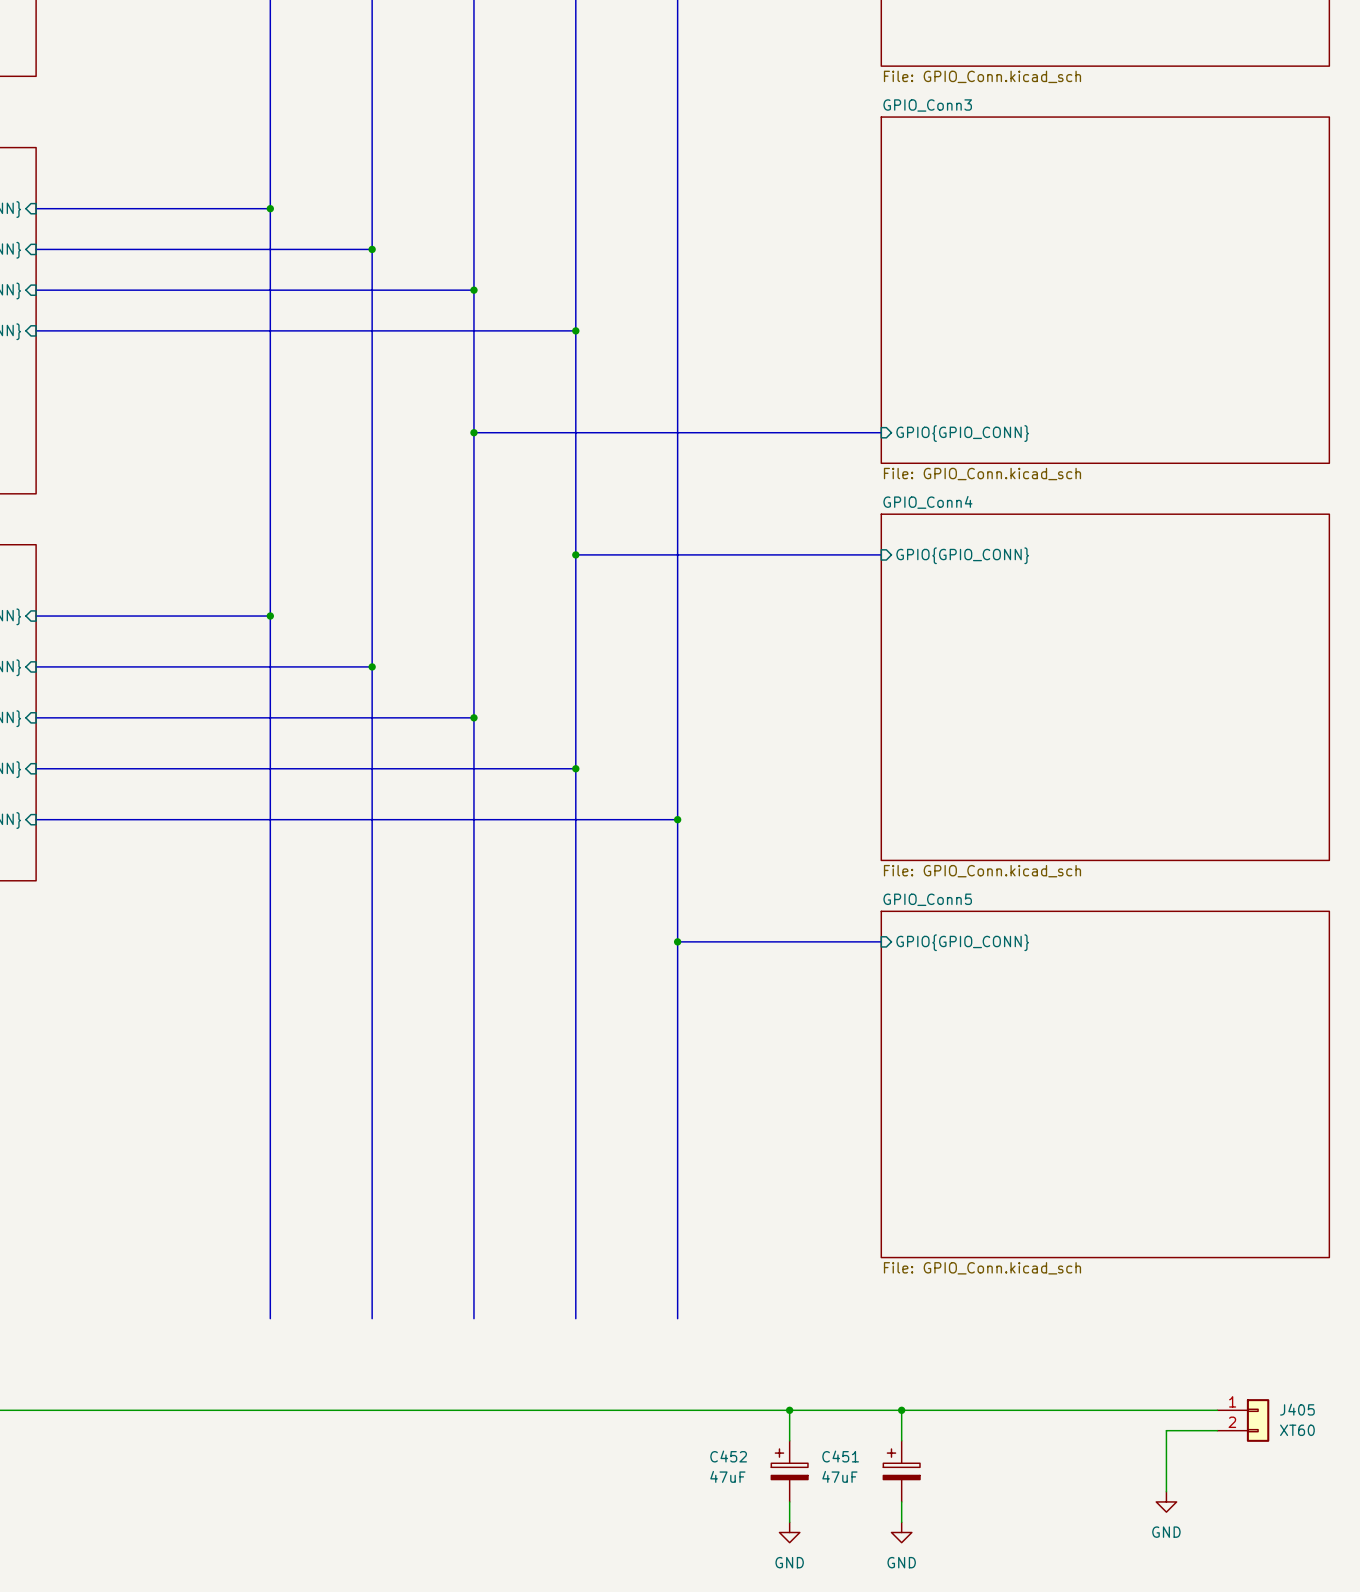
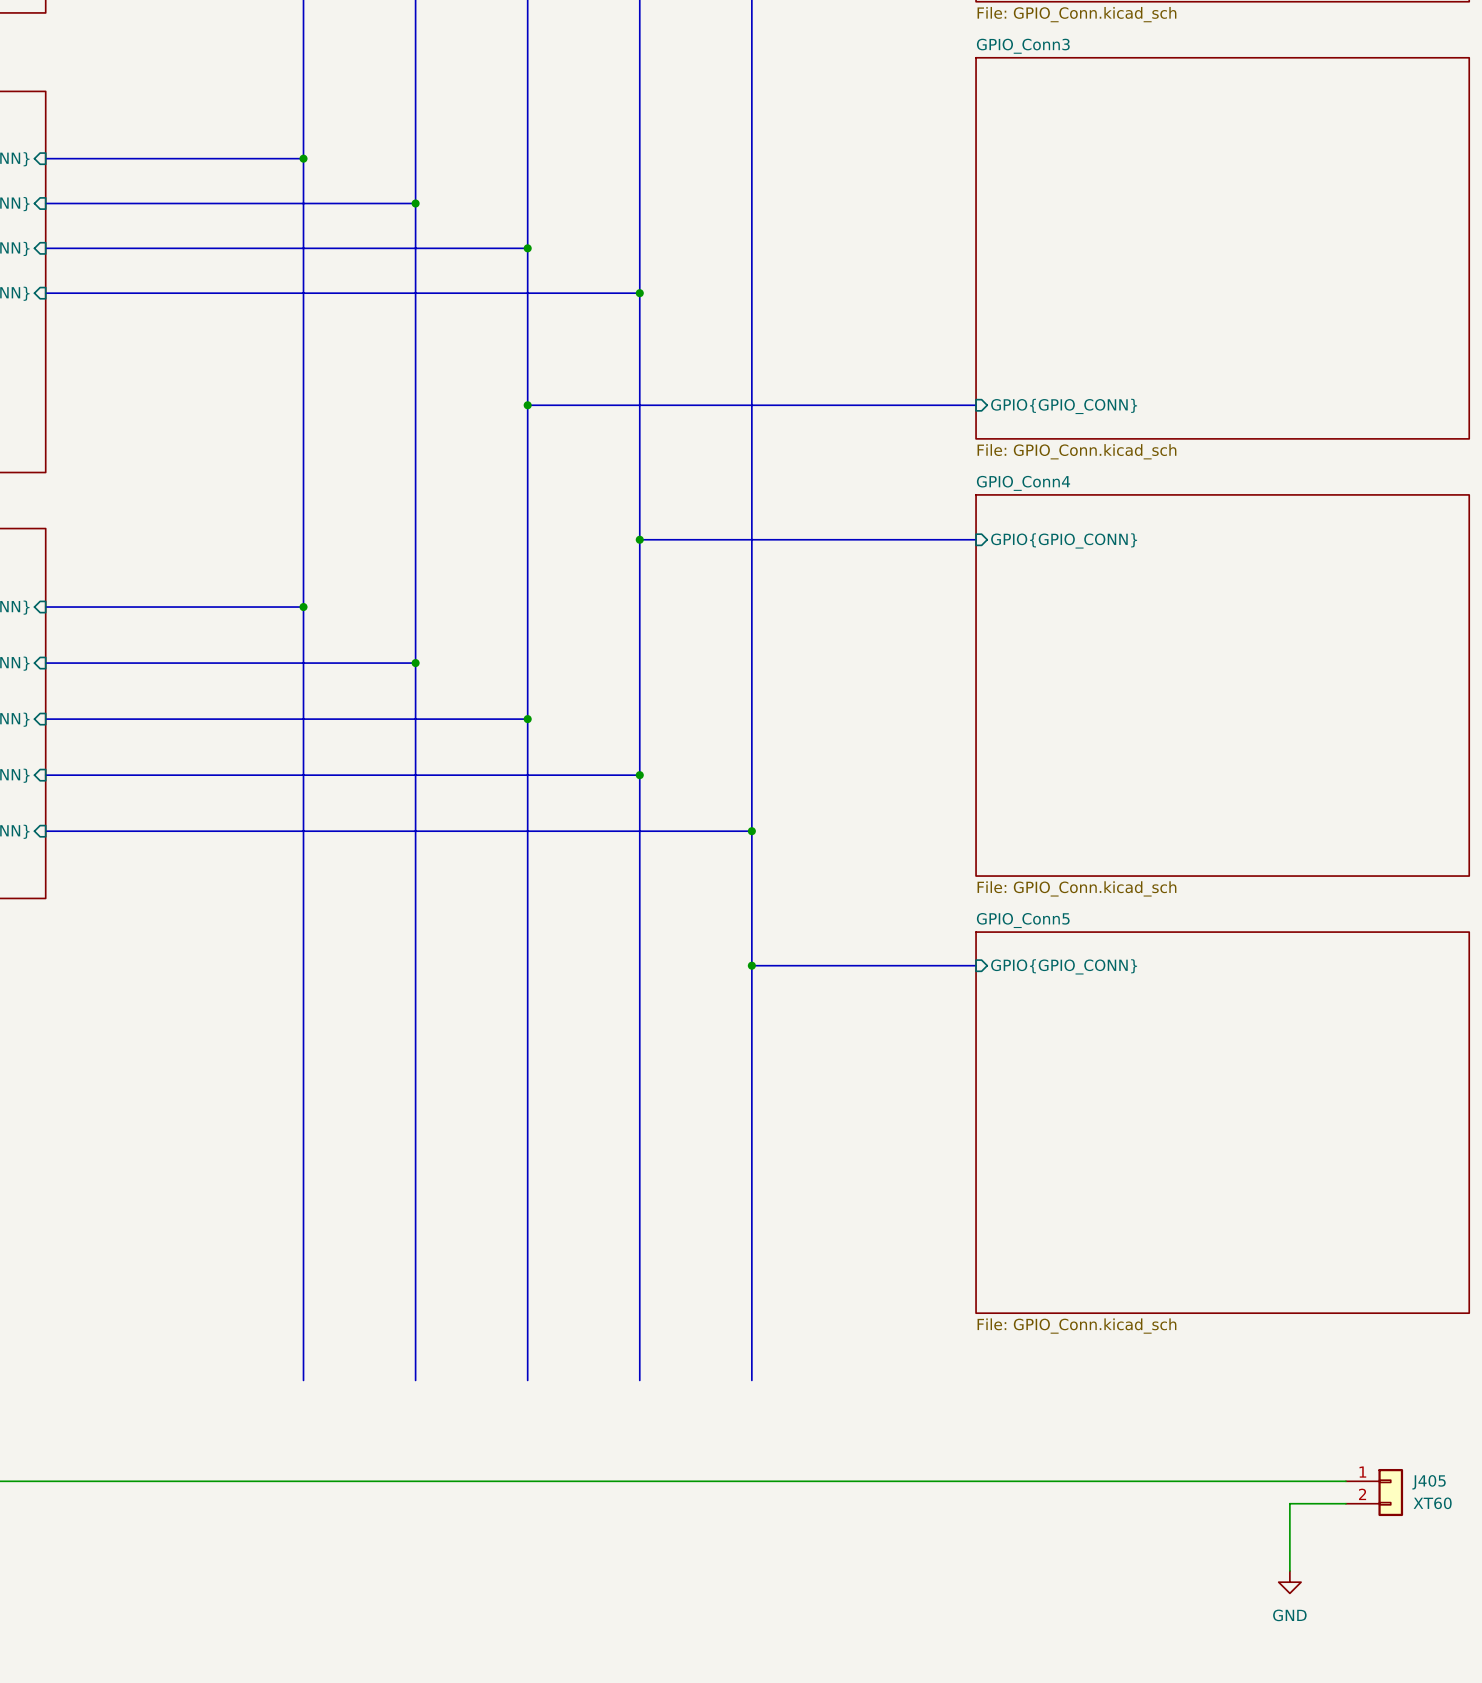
wire: (789, 1410) (789, 1440) -> none
junction: (789, 1410) -> none
wire: (901, 1410) (901, 1440) -> none
junction: (901, 1410) -> none
C452: 47uF (789, 1471) -> none
C451: 47uF (901, 1471) -> none
wire: (789, 1501) (789, 1522) -> none
wire: (901, 1501) (901, 1522) -> none
power symbol: GND (789, 1532) -> none
power symbol: GND (901, 1532) -> none

